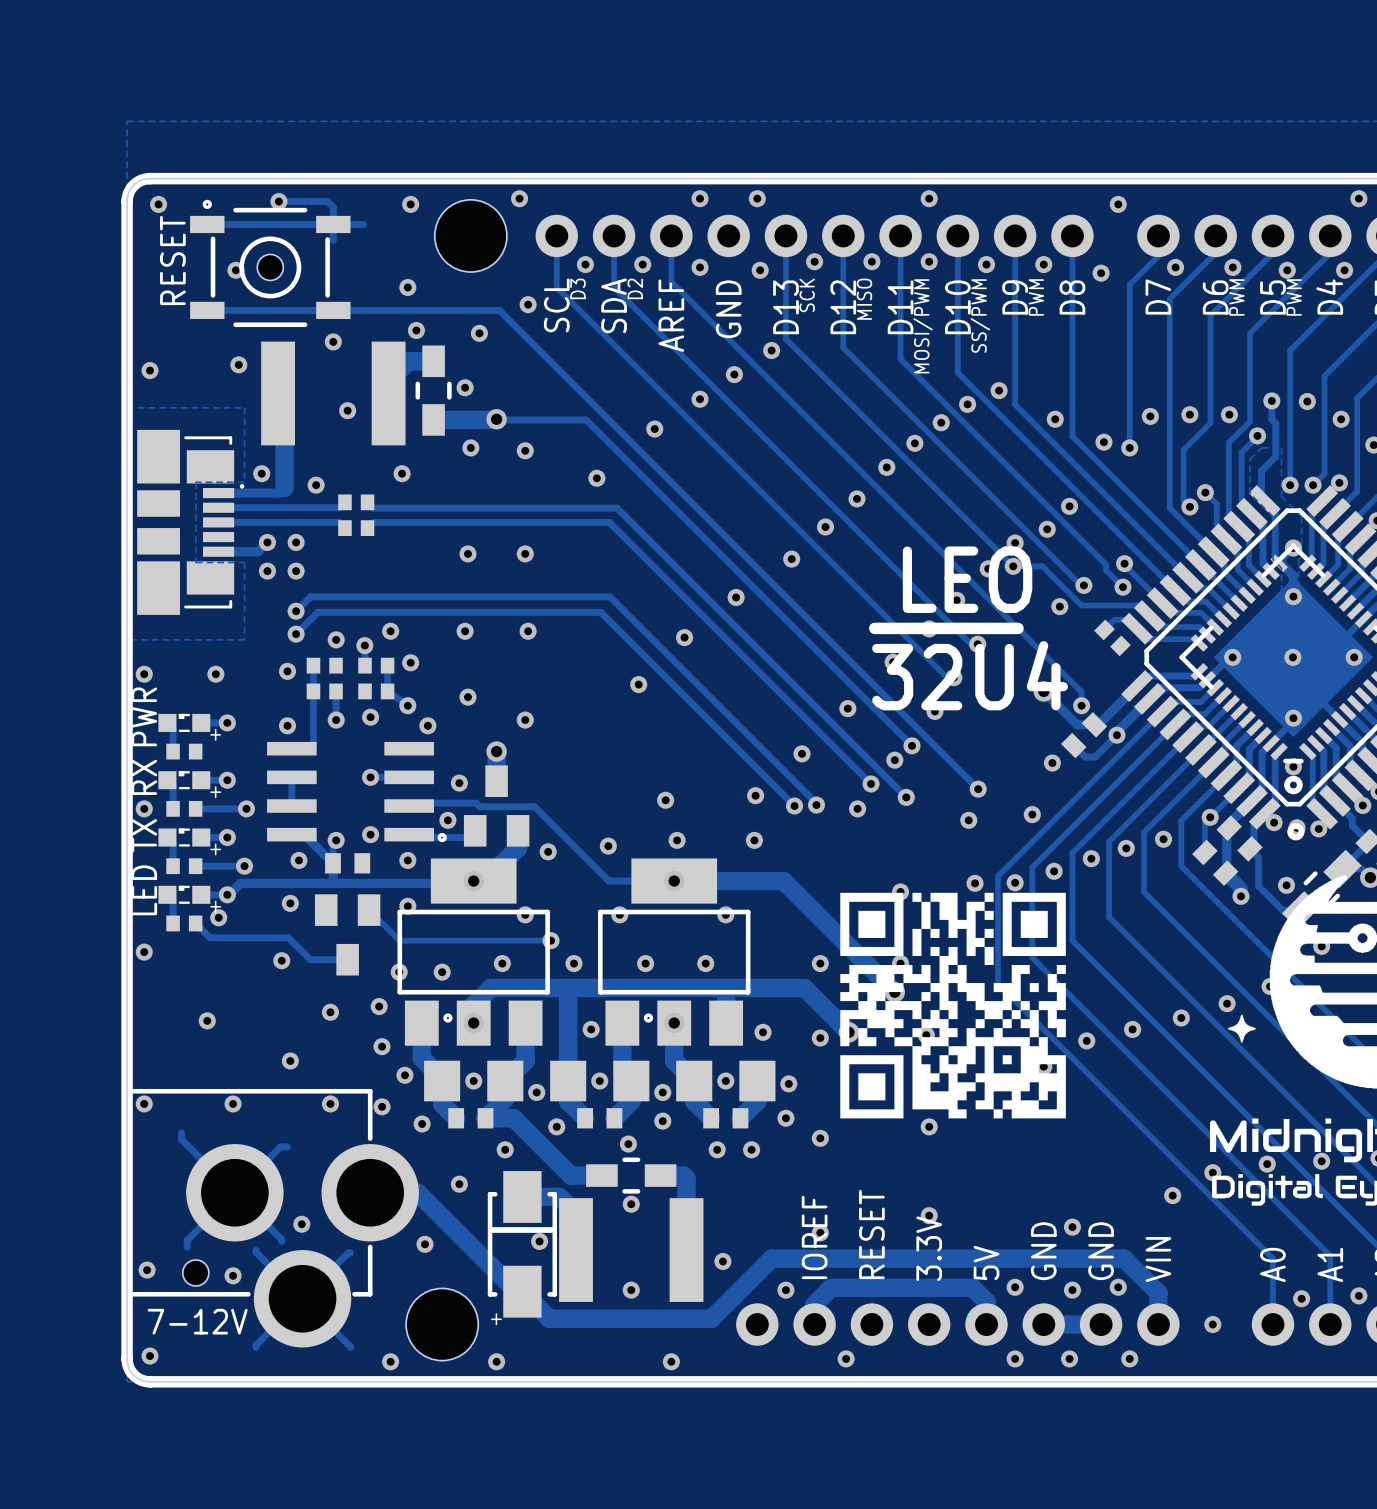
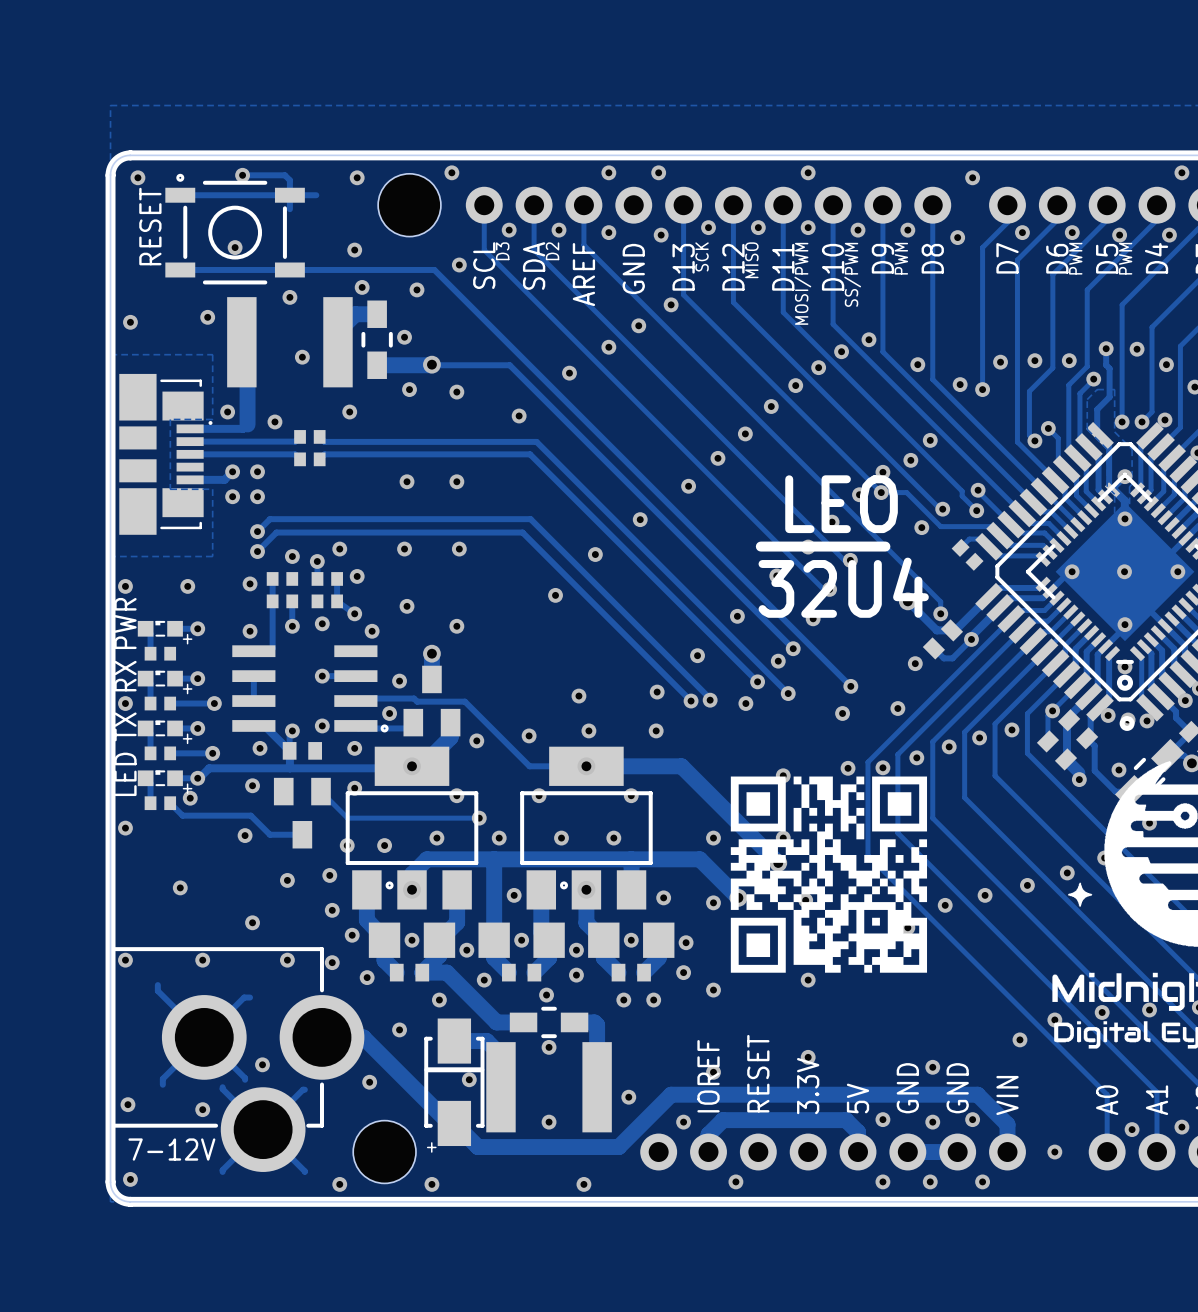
part: (270, 267) -> none
via position: (235, 270) -> (235, 247)
part: (195, 1272) -> none

